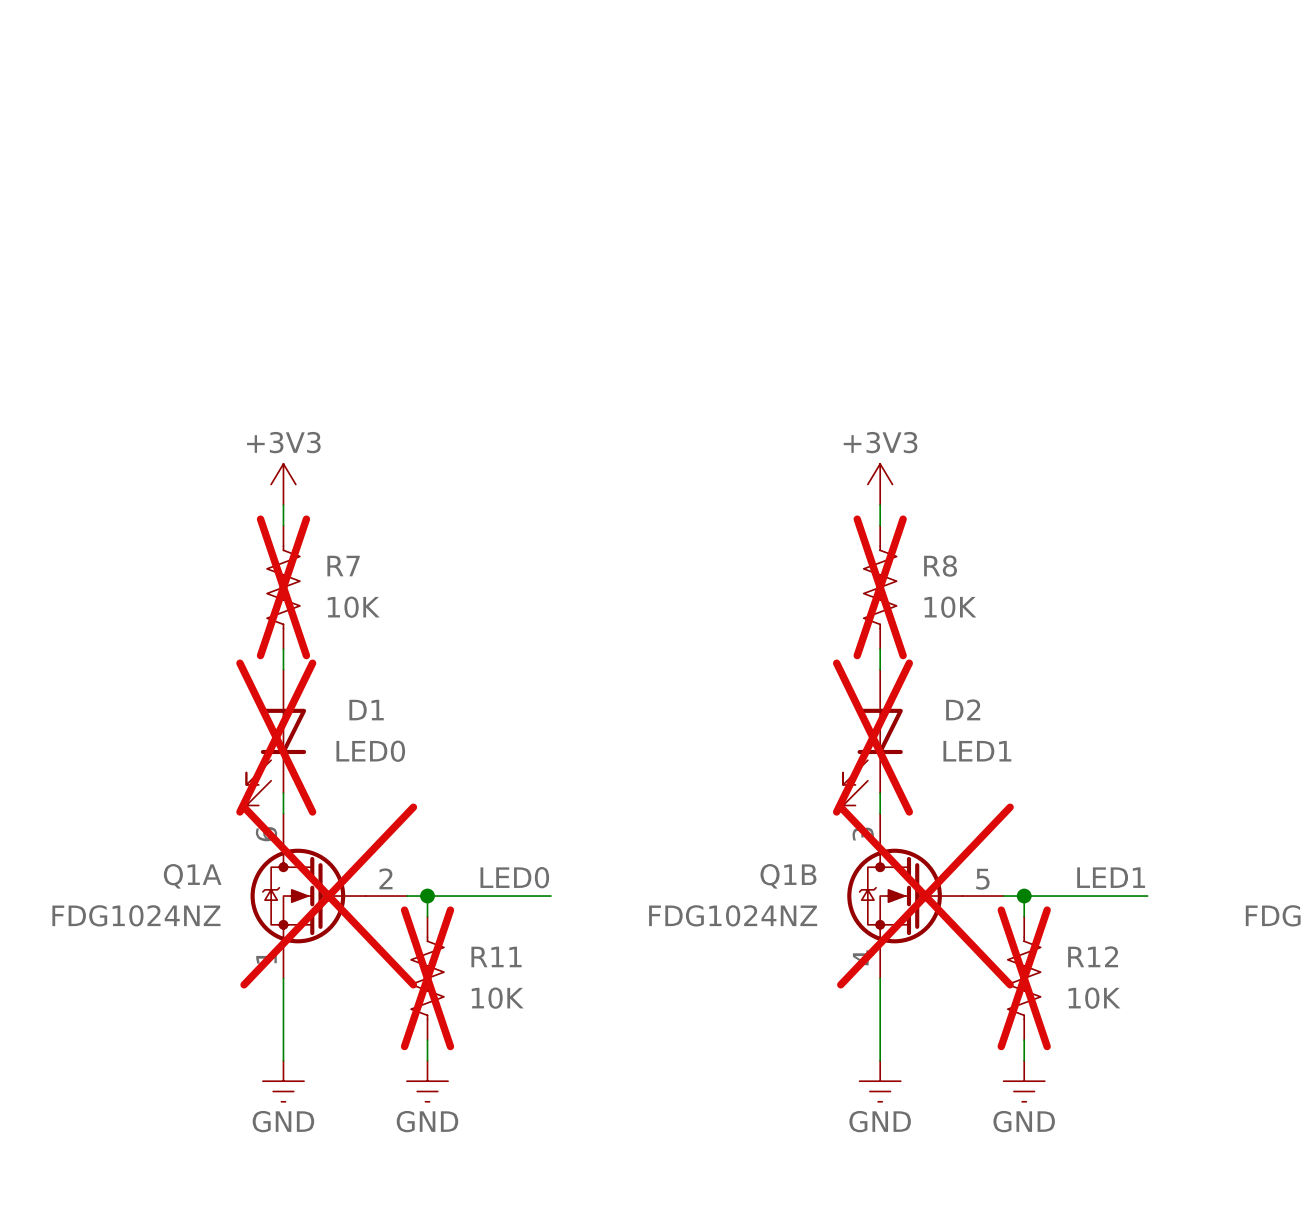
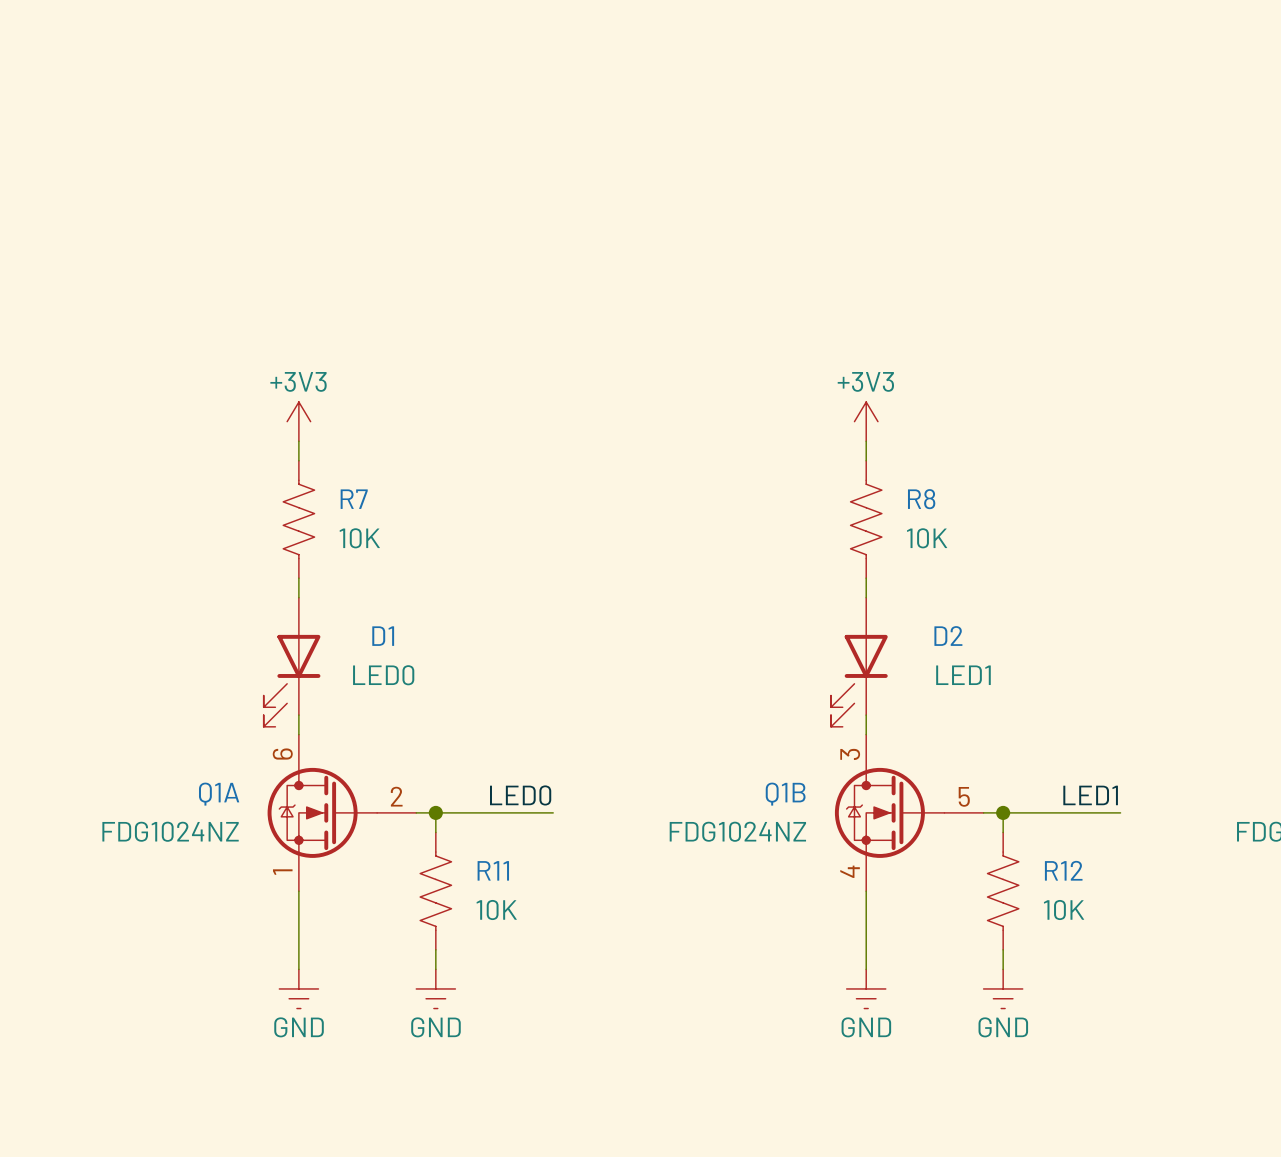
R7 do-not-place cross: (283, 587) -> none
R8 do-not-place cross: (880, 587) -> none
D1 do-not-place cross: (276, 737) -> none
D2 do-not-place cross: (872, 737) -> none
Q1A do-not-place cross: (328, 896) -> none
Q1B do-not-place cross: (925, 896) -> none
R11 do-not-place cross: (427, 978) -> none
R12 do-not-place cross: (1024, 978) -> none

